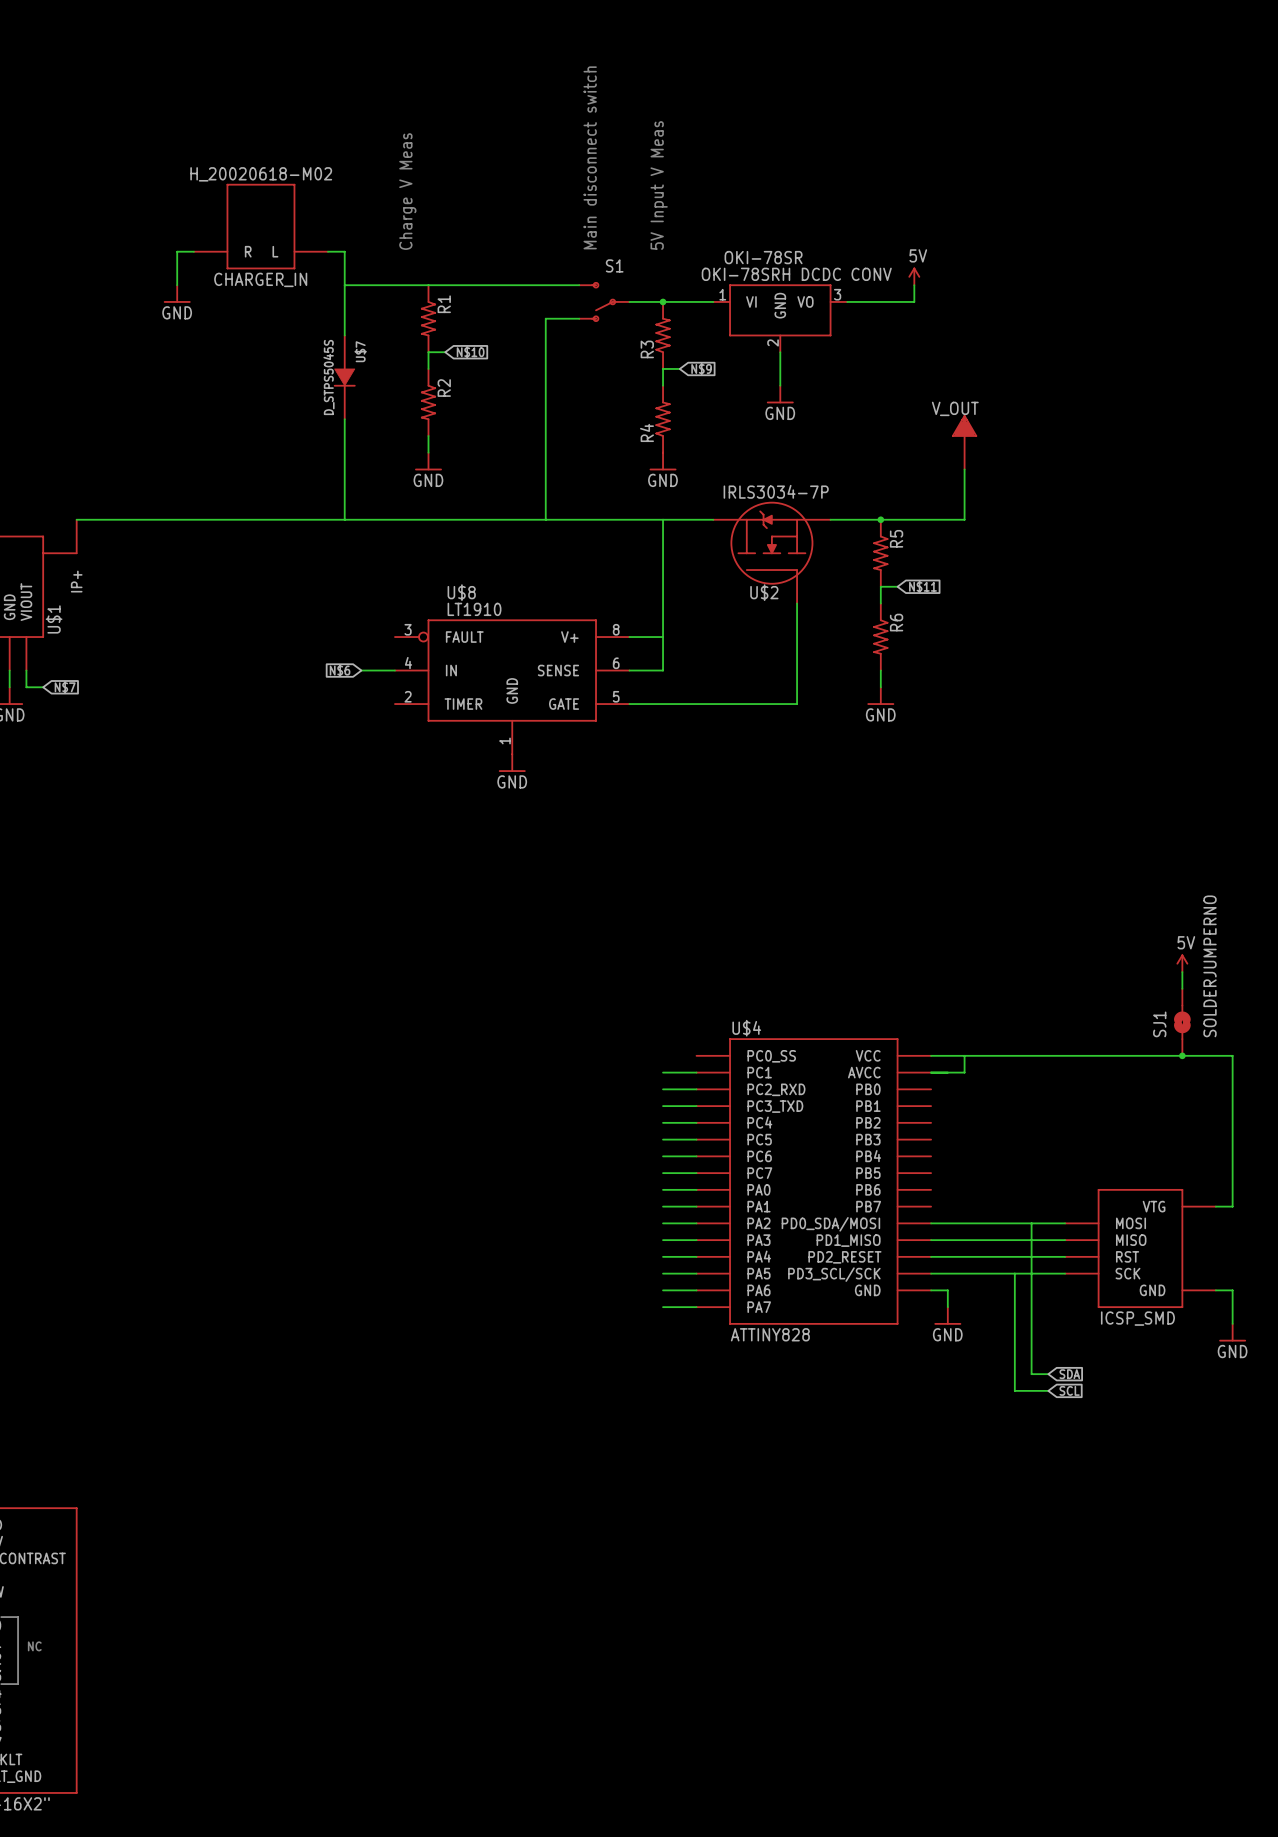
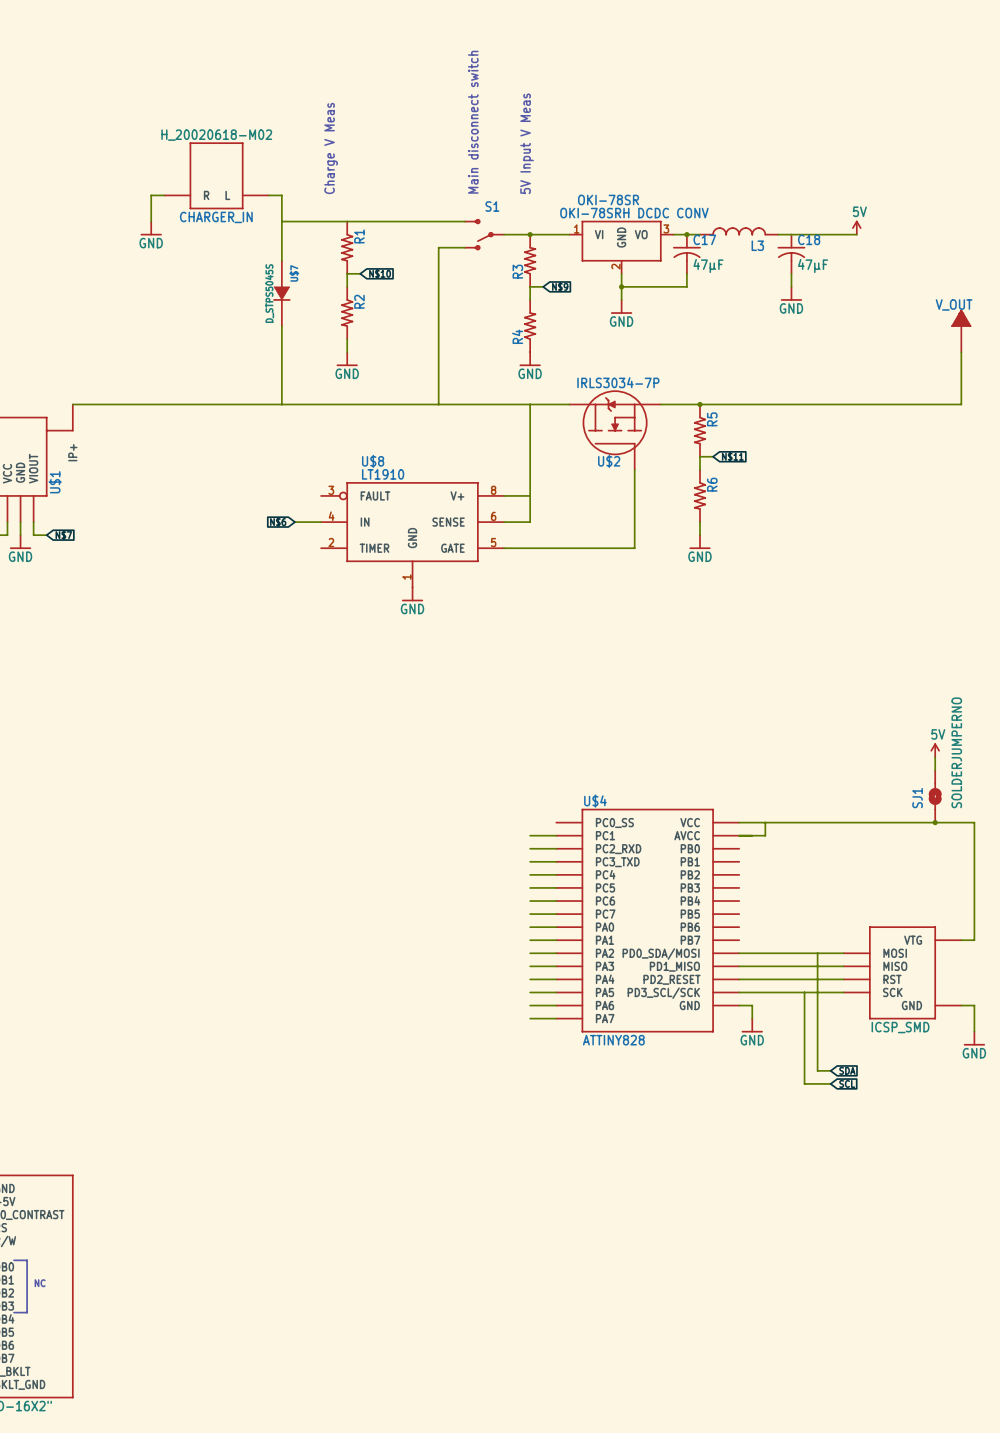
power symbol: 5V (914, 276) -> none
wire: (914, 285) (914, 301) (880, 301) -> none
power symbol: none -> 5V (856, 227)
L3: none -> (739, 231)
junction: none -> (686, 234)
wire: none -> (778, 234) (856, 234)
C17: none -> 47µF (686, 254)
C18: none -> 47µF (791, 254)
wire: none -> (686, 273) (686, 286) (621, 286)
wire: none -> (791, 273) (791, 286)
junction: none -> (621, 286)
power symbol: none -> GND (791, 293)
V_OUT: none -> (961, 331)
V_OUT: (964, 442) -> none
wire: (964, 469) (964, 519) -> (961, 352) (961, 404) (765, 404)

